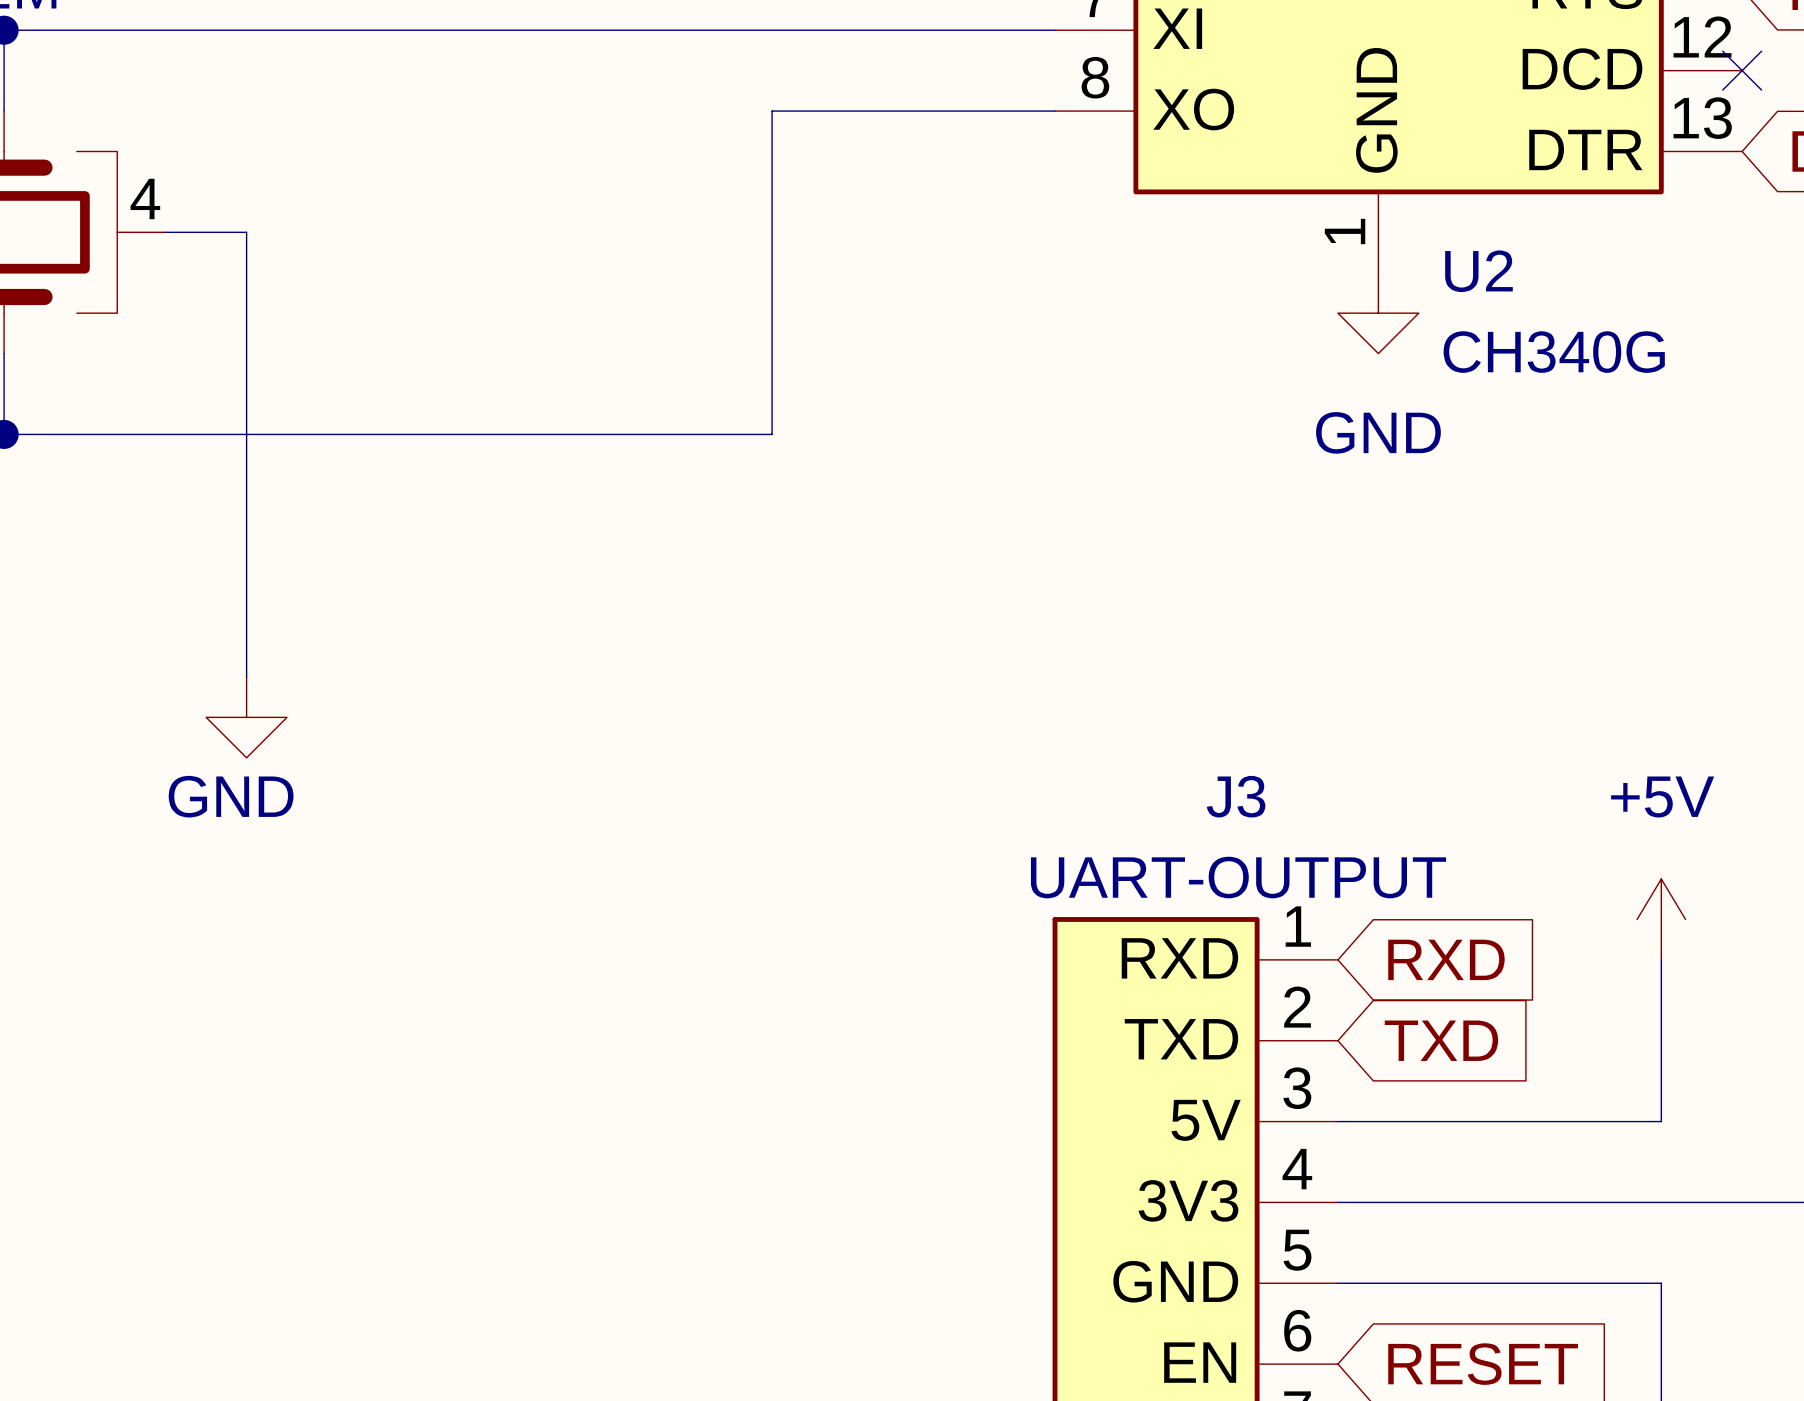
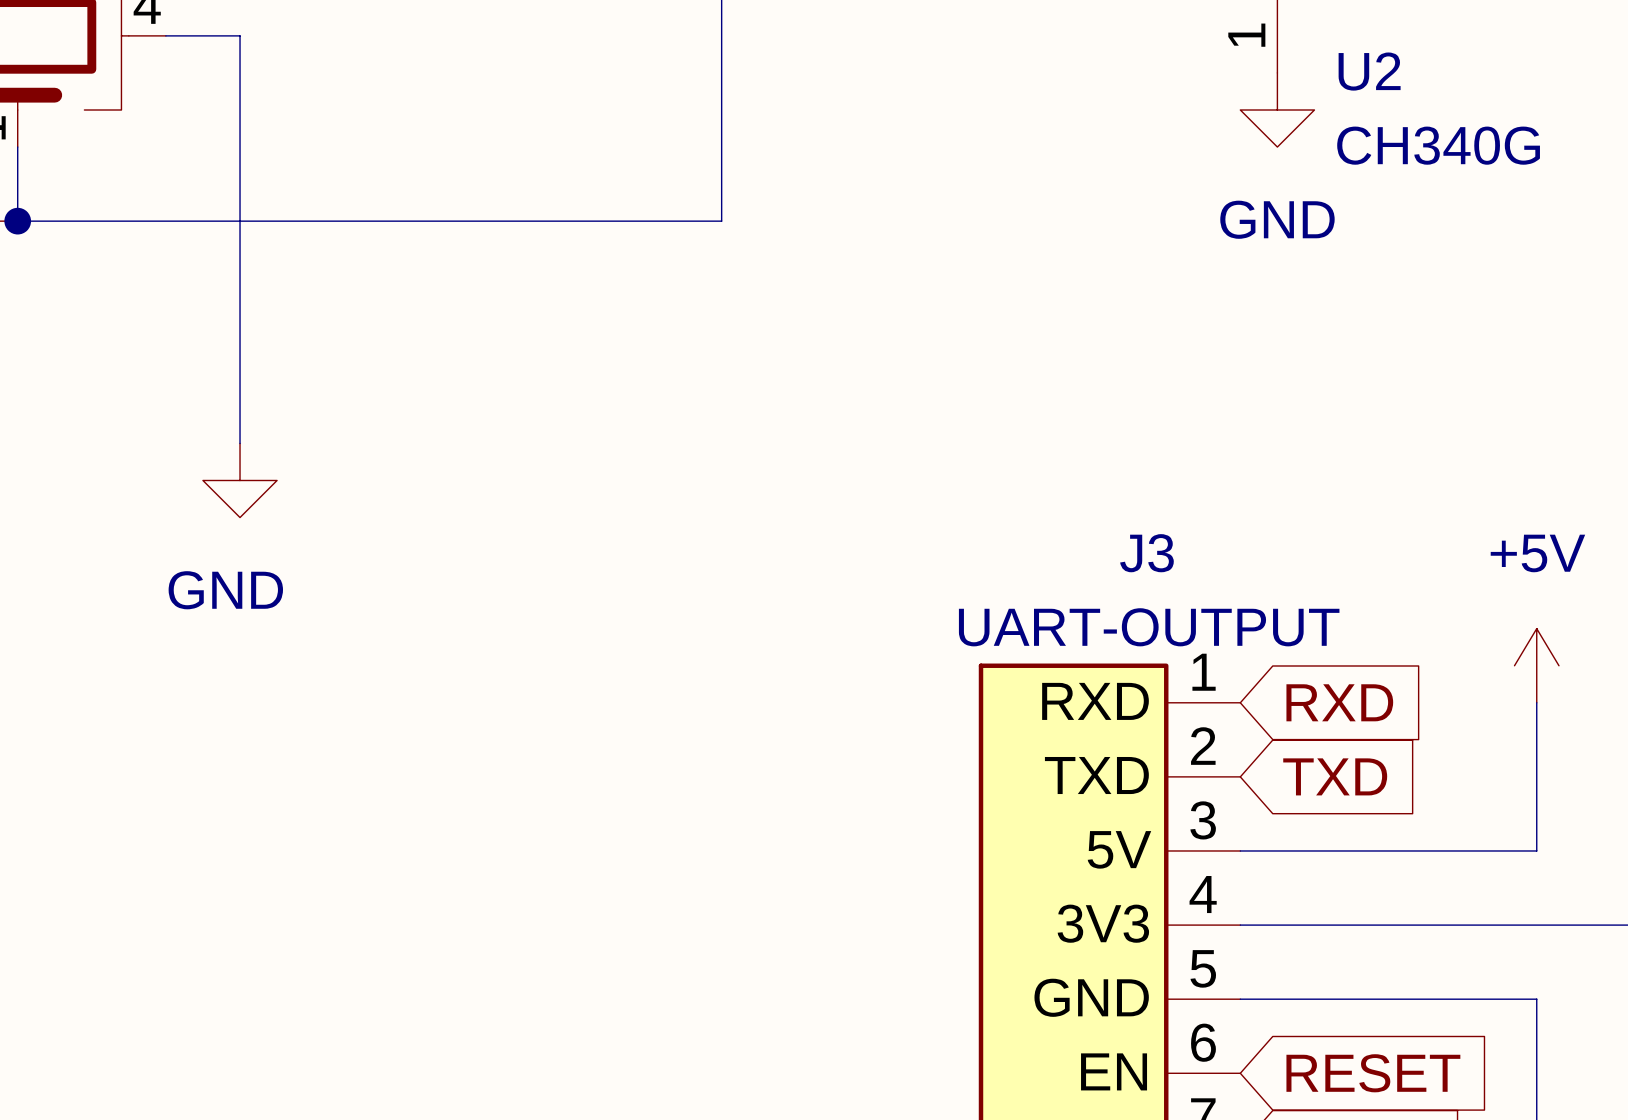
power symbol text position: GND (231, 796) -> GND (225, 590)

